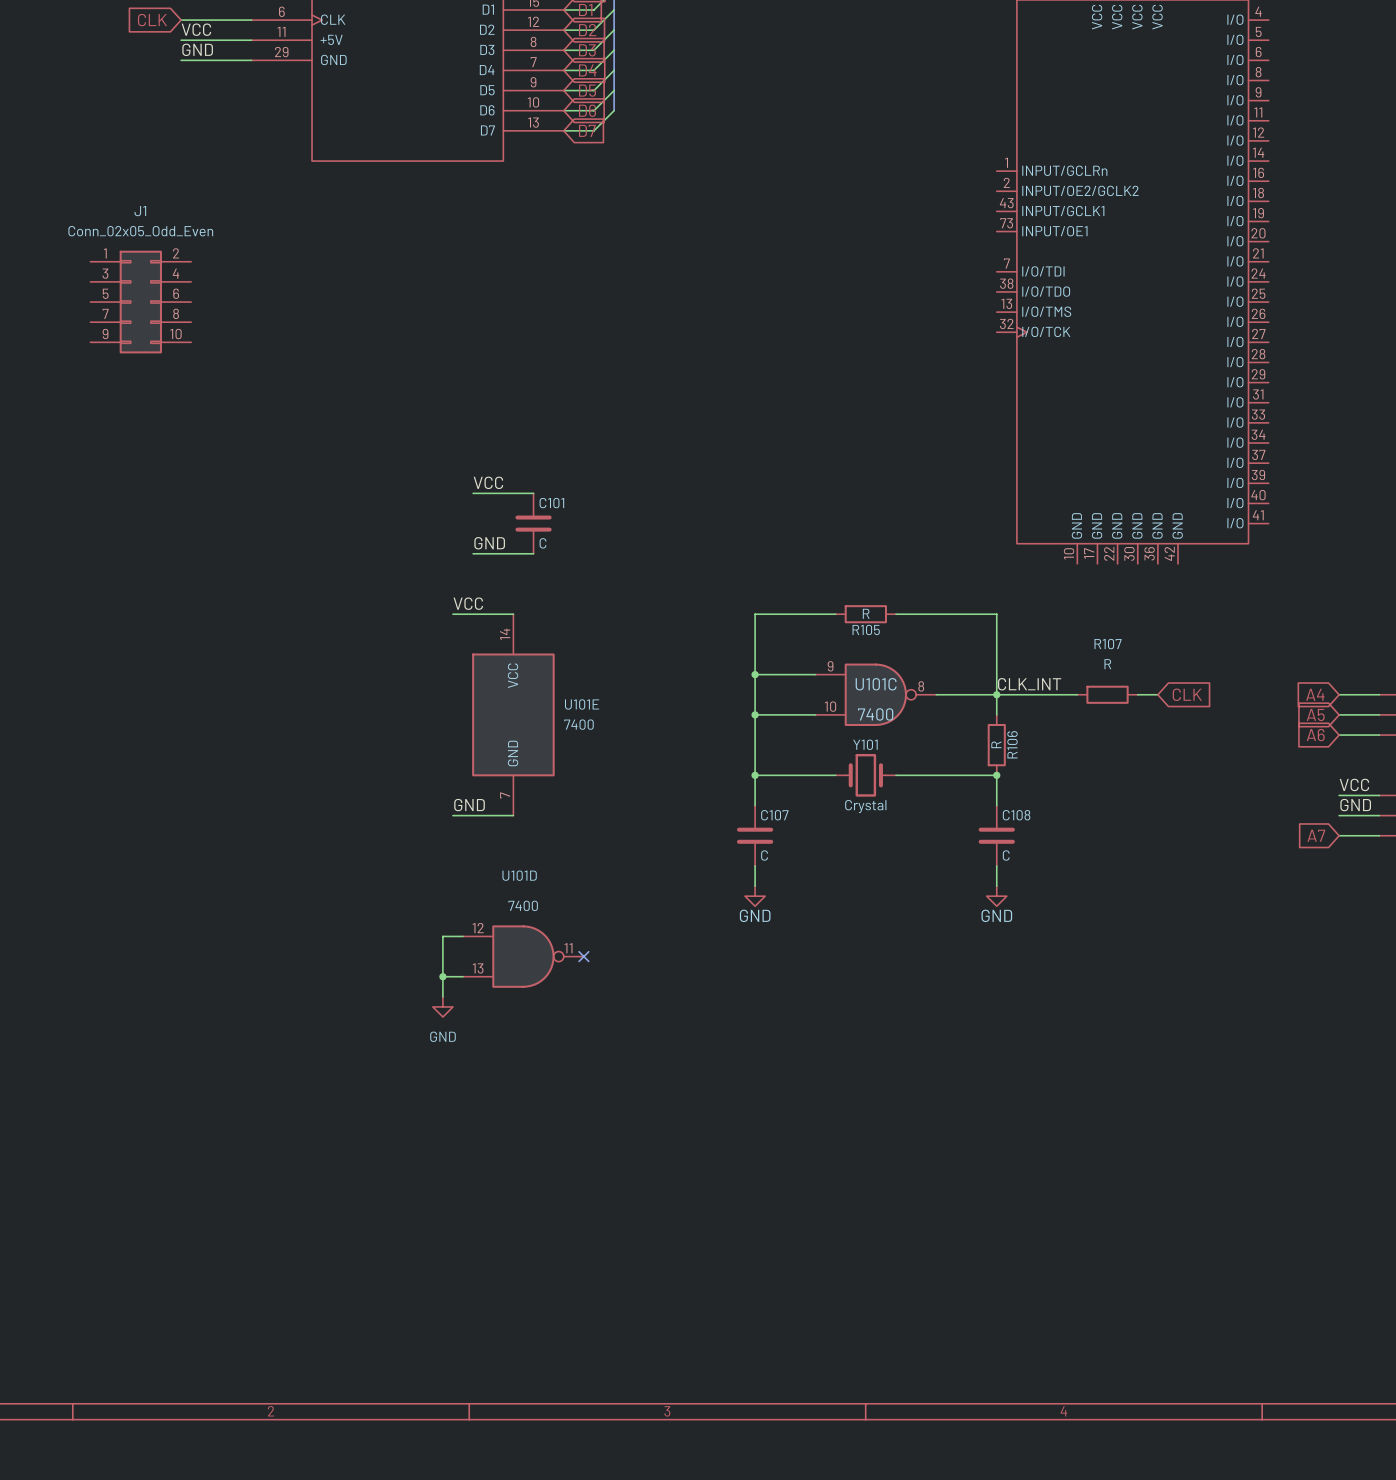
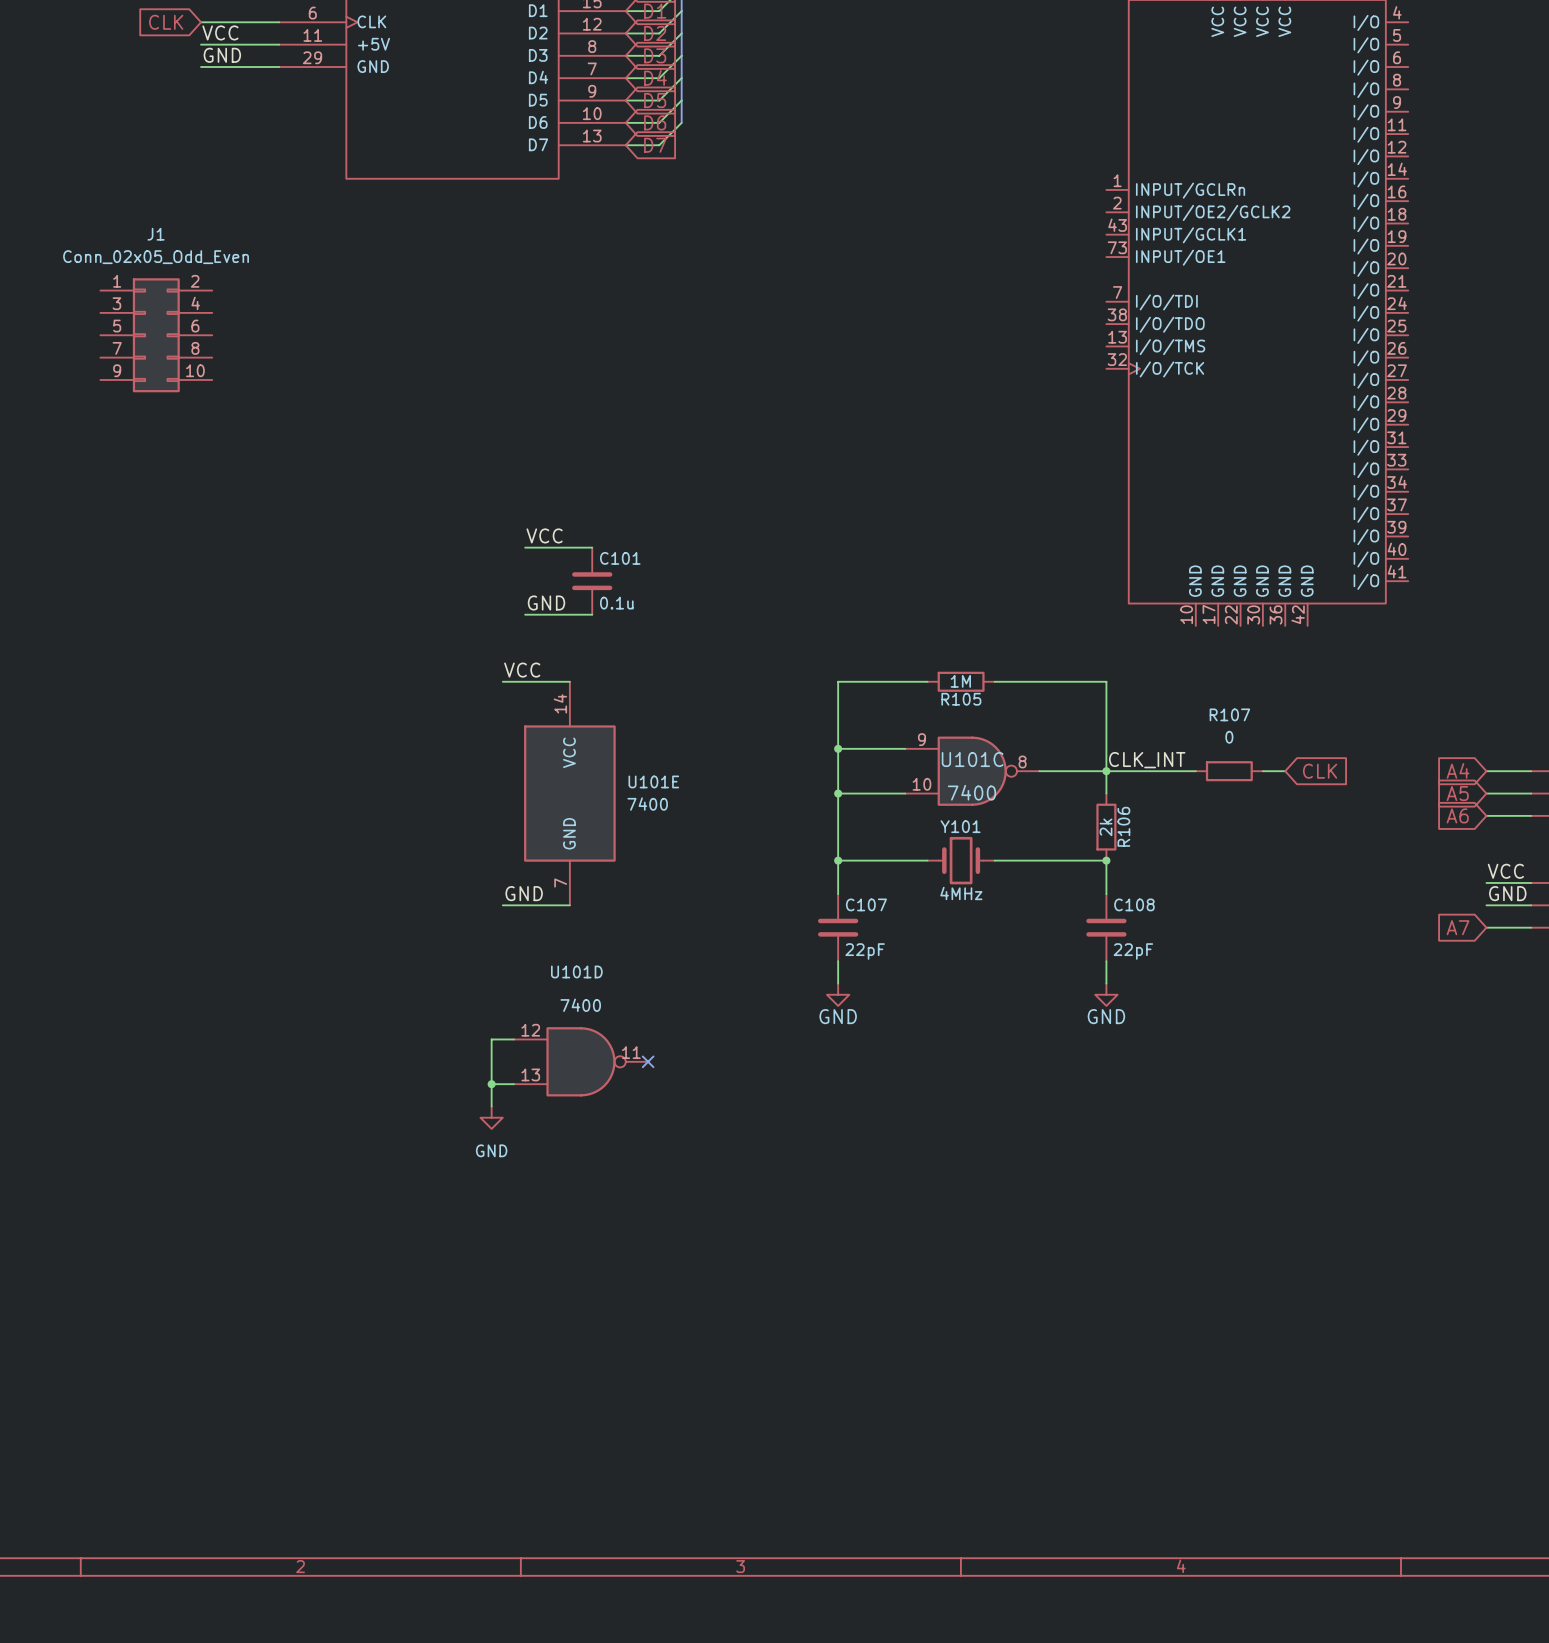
C101 value: C (542, 543) -> 0.1u (616, 603)
R105 value: R (866, 613) -> 1M (960, 681)
R107 value: R (1107, 664) -> 0 (1229, 737)
R106 value: R (996, 744) -> 2k (1106, 827)
Y101 value: Crystal (865, 806) -> 4MHz (961, 893)
C107 value: C (764, 855) -> 22pF (865, 951)
C108 value: C (1006, 855) -> 22pF (1133, 951)

